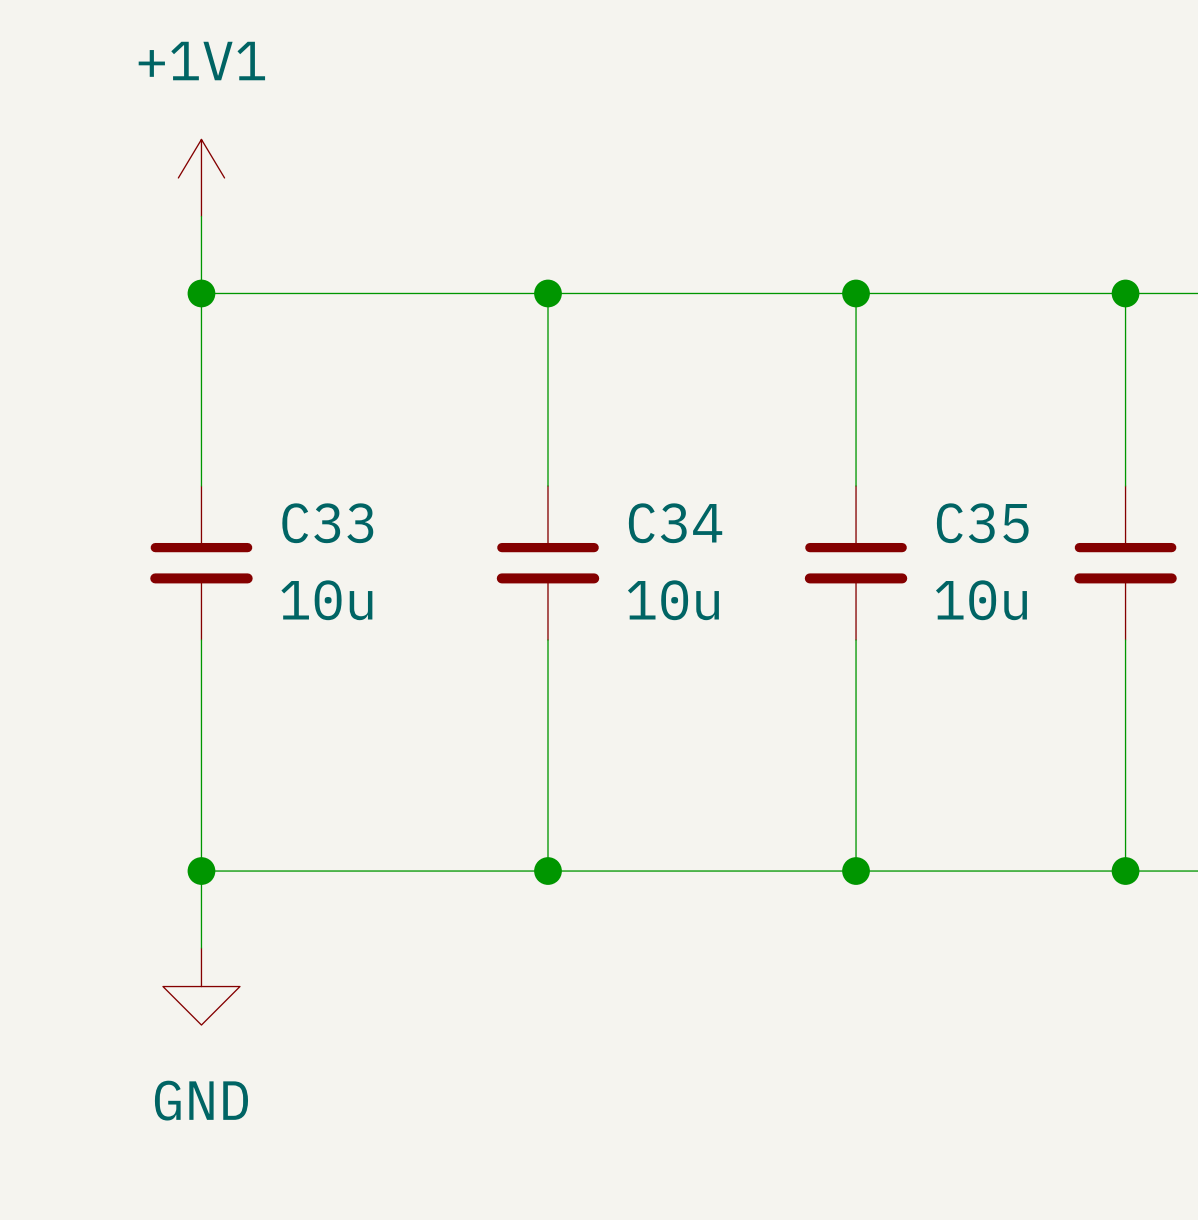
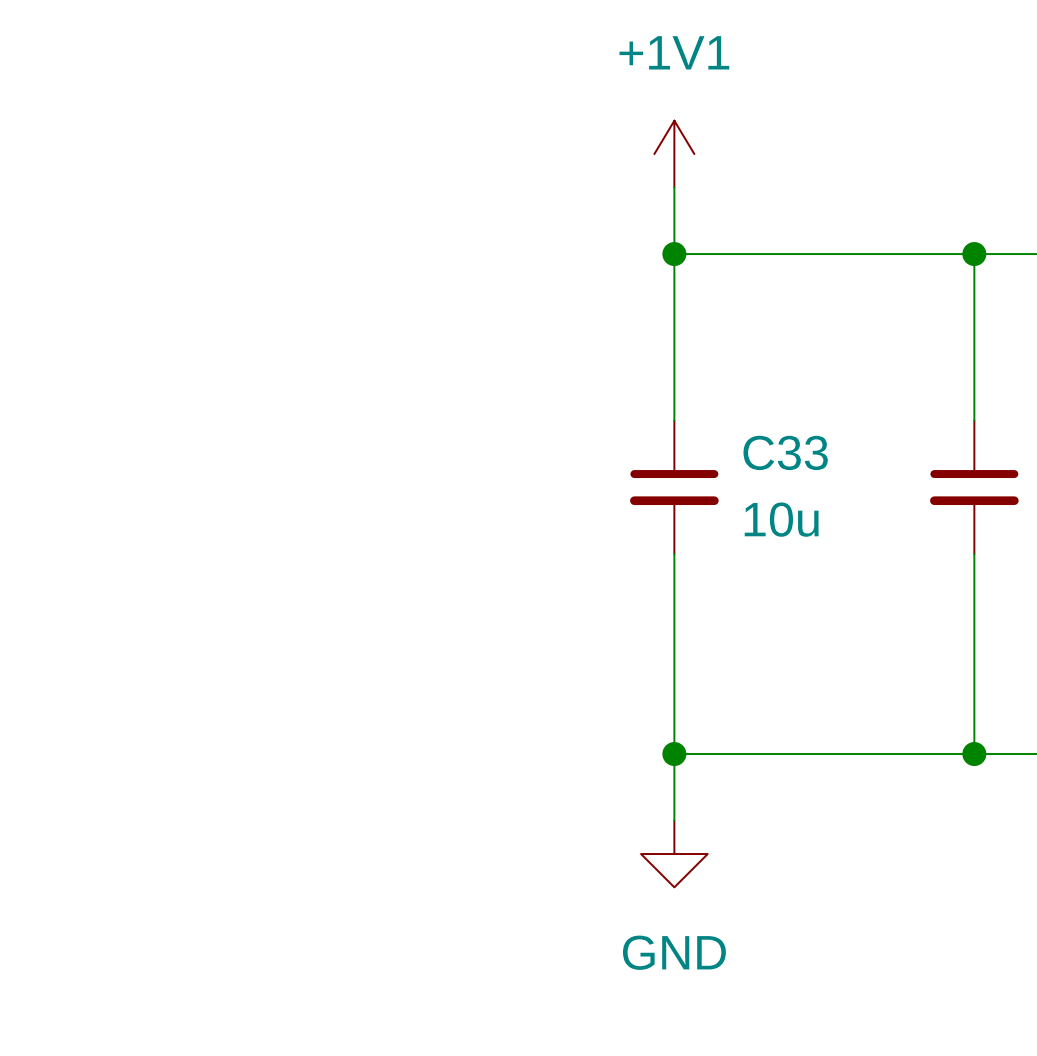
power symbol position: +1V1 (201, 177) -> +1V1 (674, 154)
wire: (201, 216) (201, 485) -> (674, 187) (674, 420)
wire: (201, 293) (779, 293) -> none
junction: (201, 293) -> none
wire: (547, 293) (547, 485) -> none
junction: (547, 293) -> none
wire: (856, 293) (856, 485) -> none
junction position: (856, 293) -> (674, 254)
C33 position: (201, 563) -> (674, 487)
C34: 10u (547, 563) -> none
C35: 10u (856, 563) -> none
wire: (201, 640) (201, 948) -> (674, 554) (674, 820)
wire: (547, 640) (547, 871) -> none
wire: (856, 640) (856, 871) -> none
wire: (201, 871) (779, 871) -> none
junction: (201, 871) -> none
junction: (547, 871) -> none
junction position: (856, 871) -> (674, 754)
power symbol position: GND (201, 986) -> GND (674, 854)

